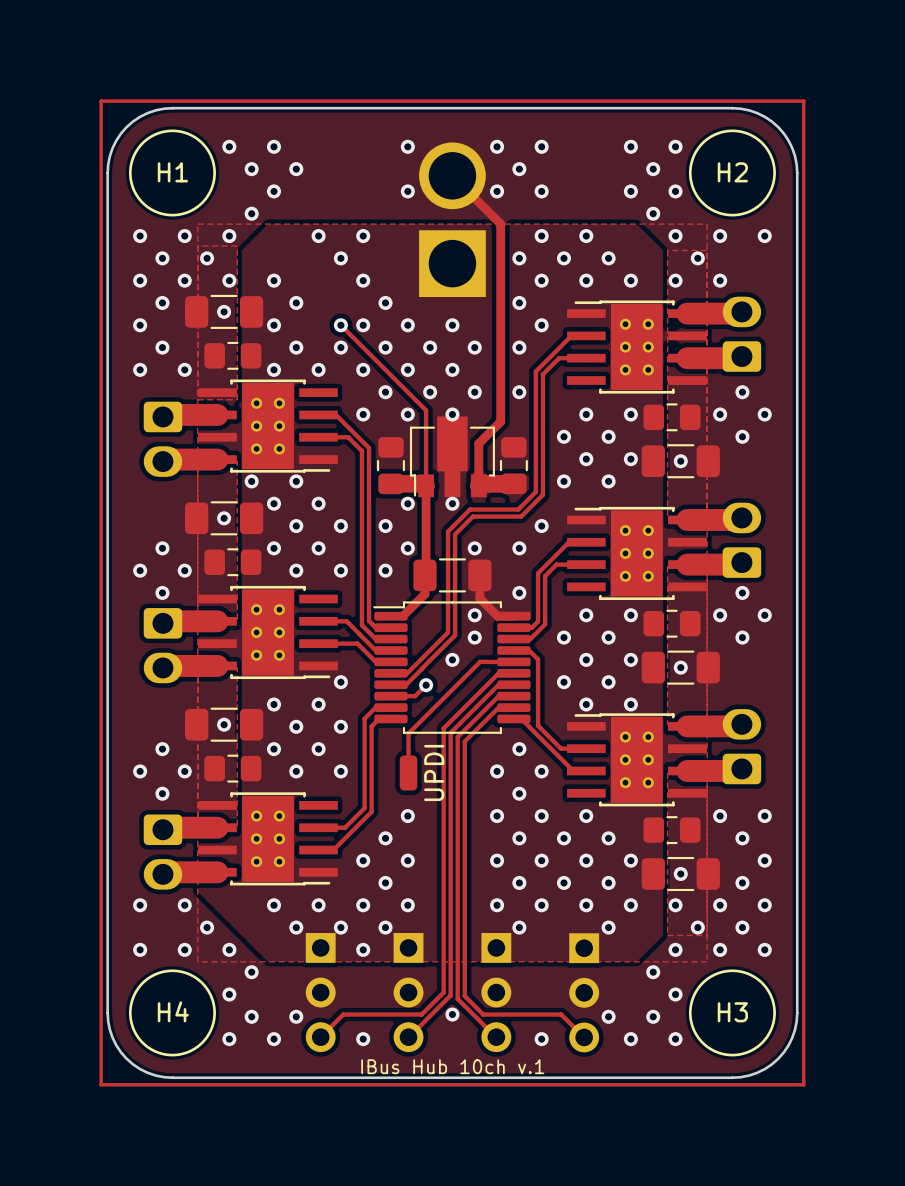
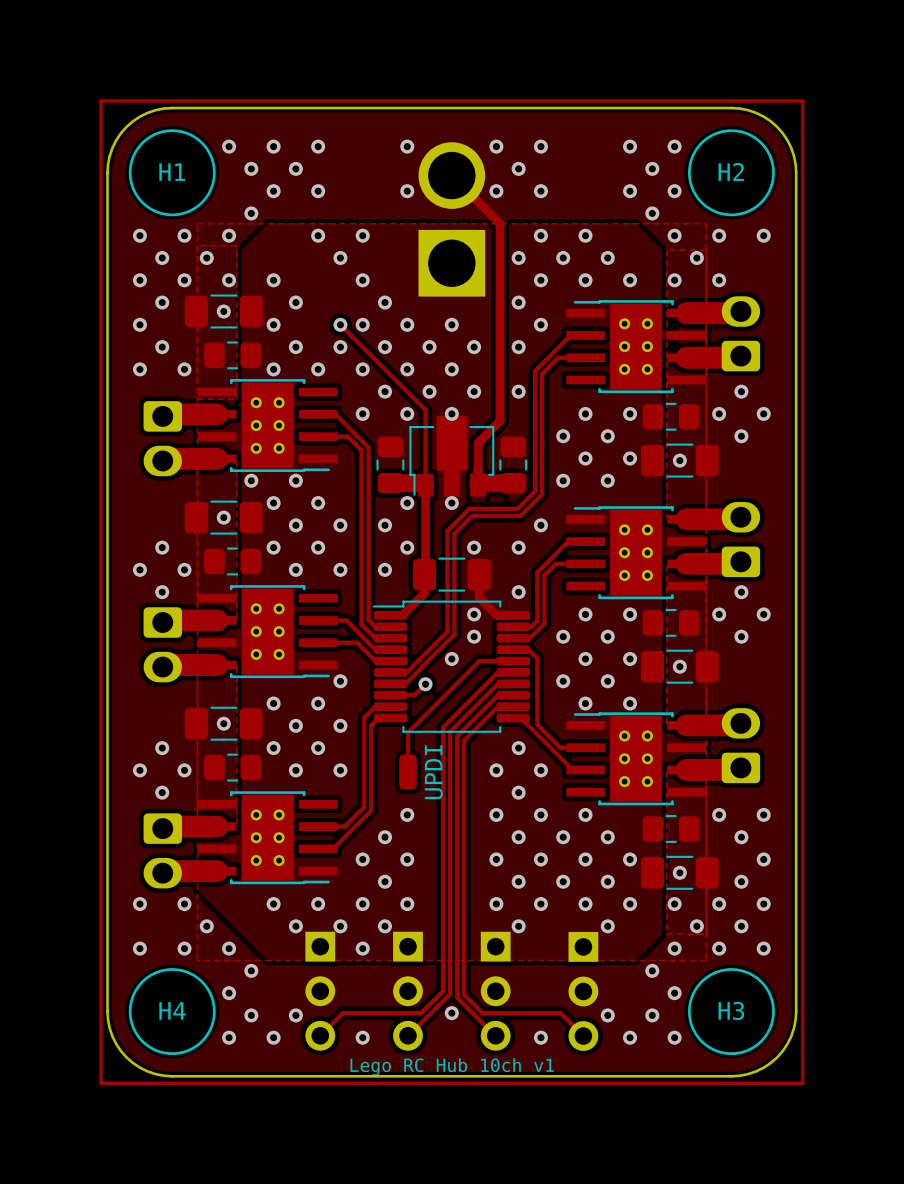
via: none -> (318, 146)
via: none -> (318, 191)
text: IBus Hub 10ch v.1 (452, 1066) -> Lego RC Hub 10ch v1 (452, 1066)

